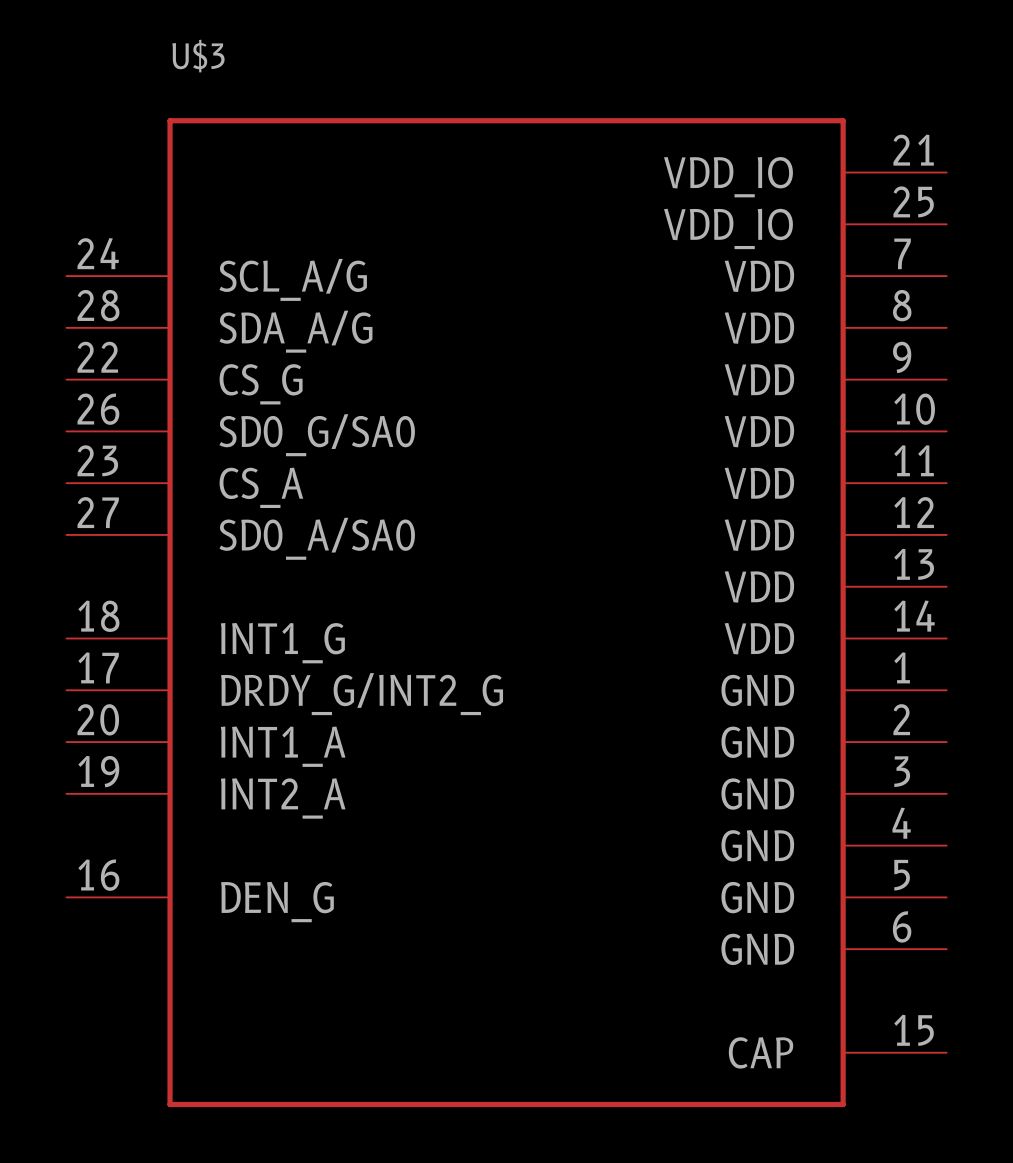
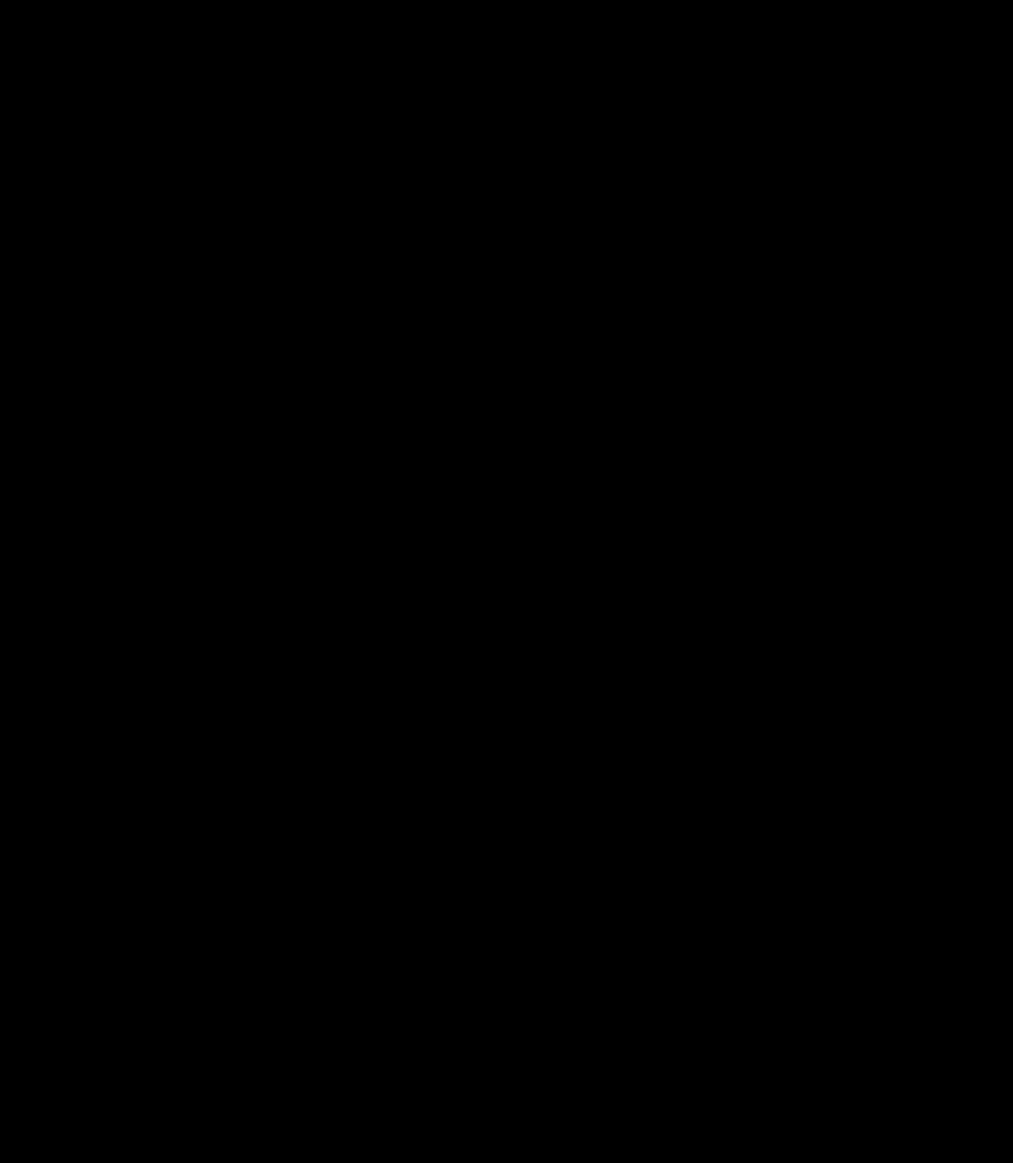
U$3: (506, 612) -> none

